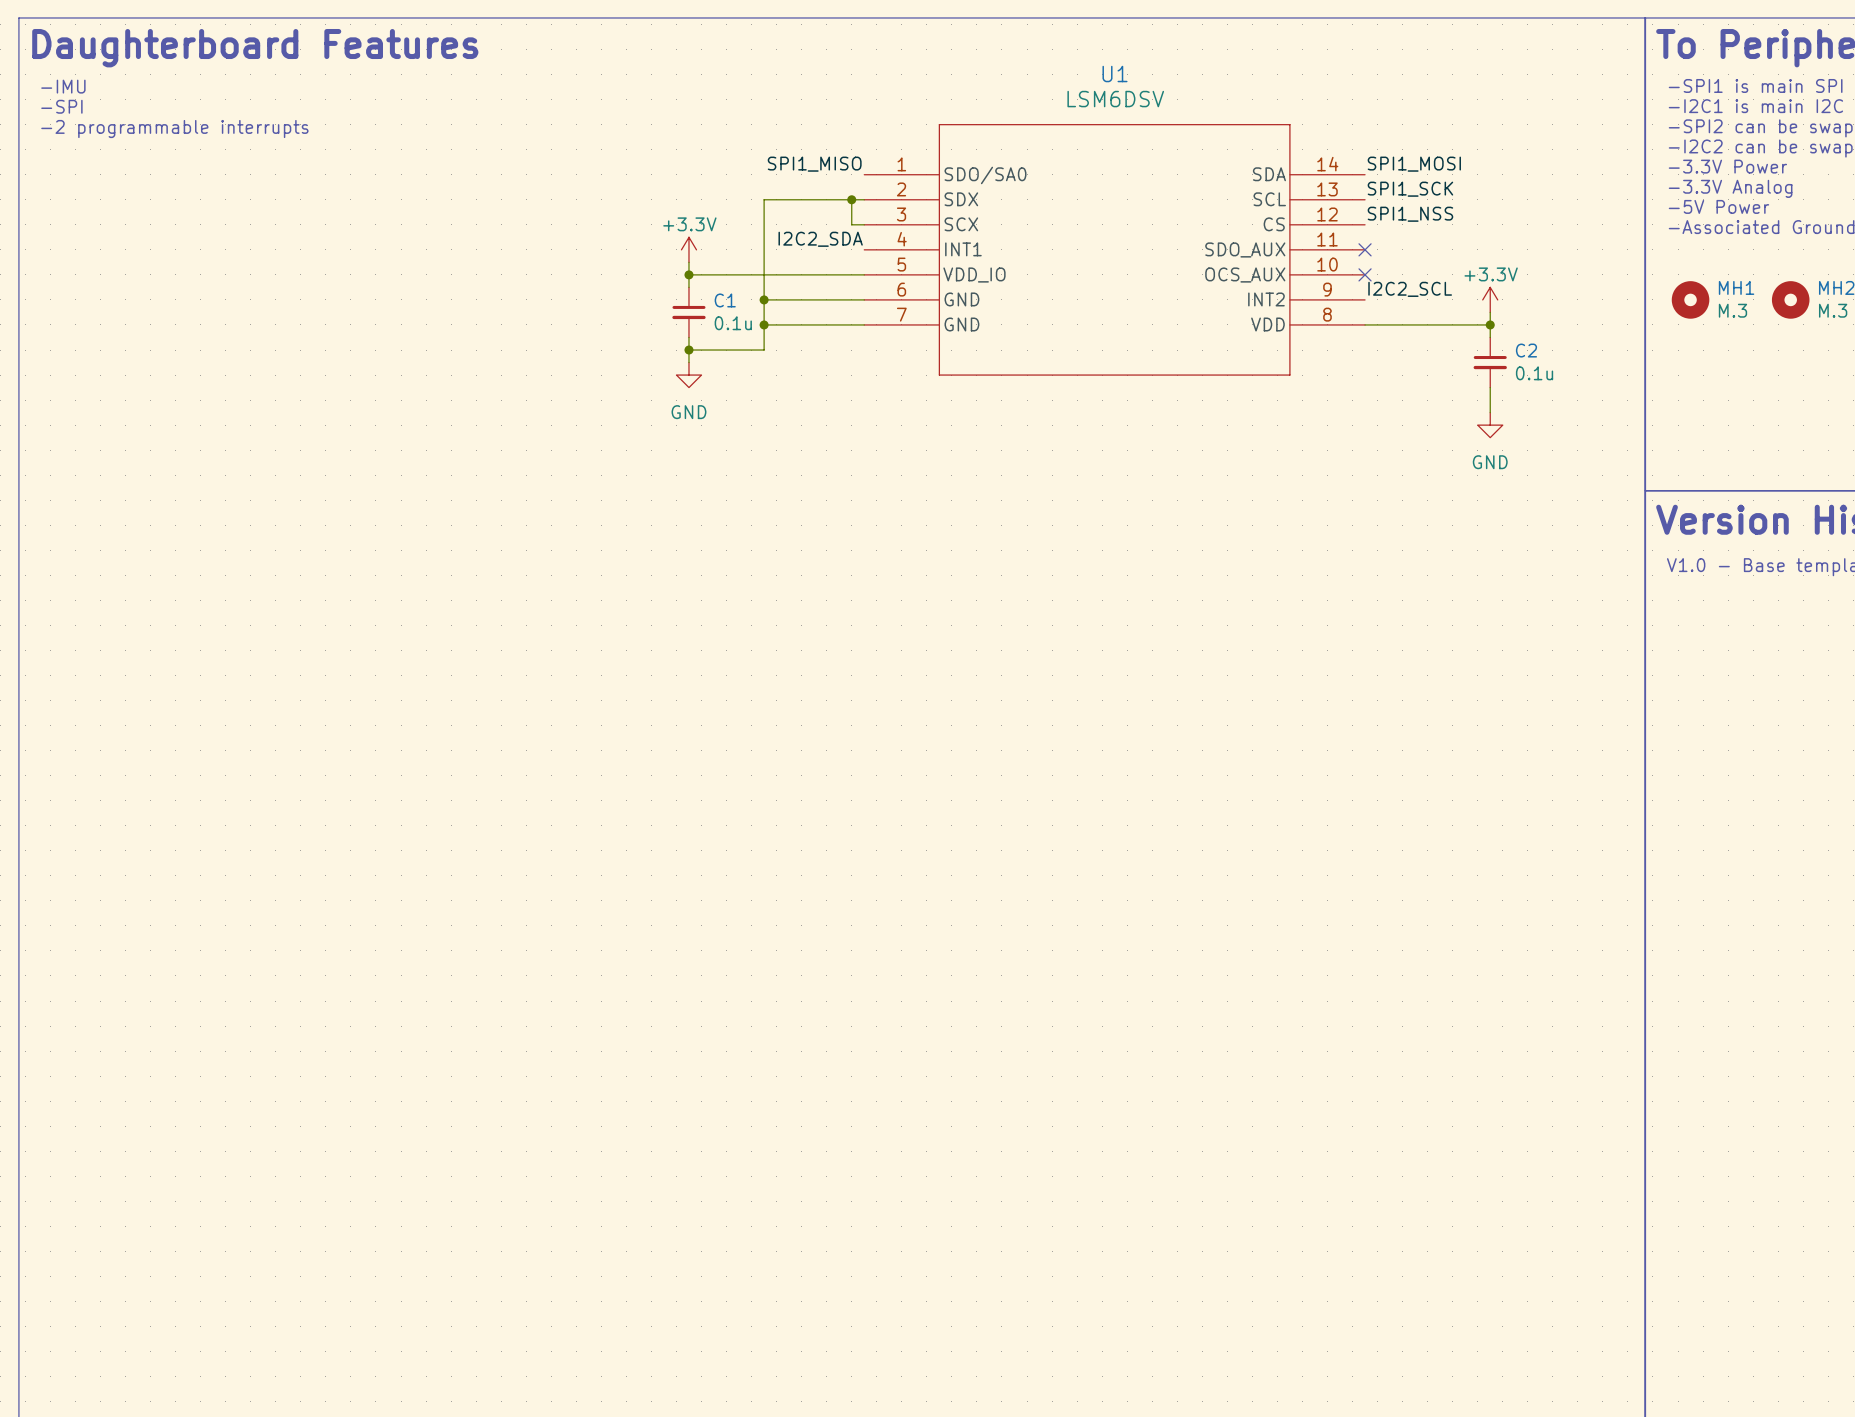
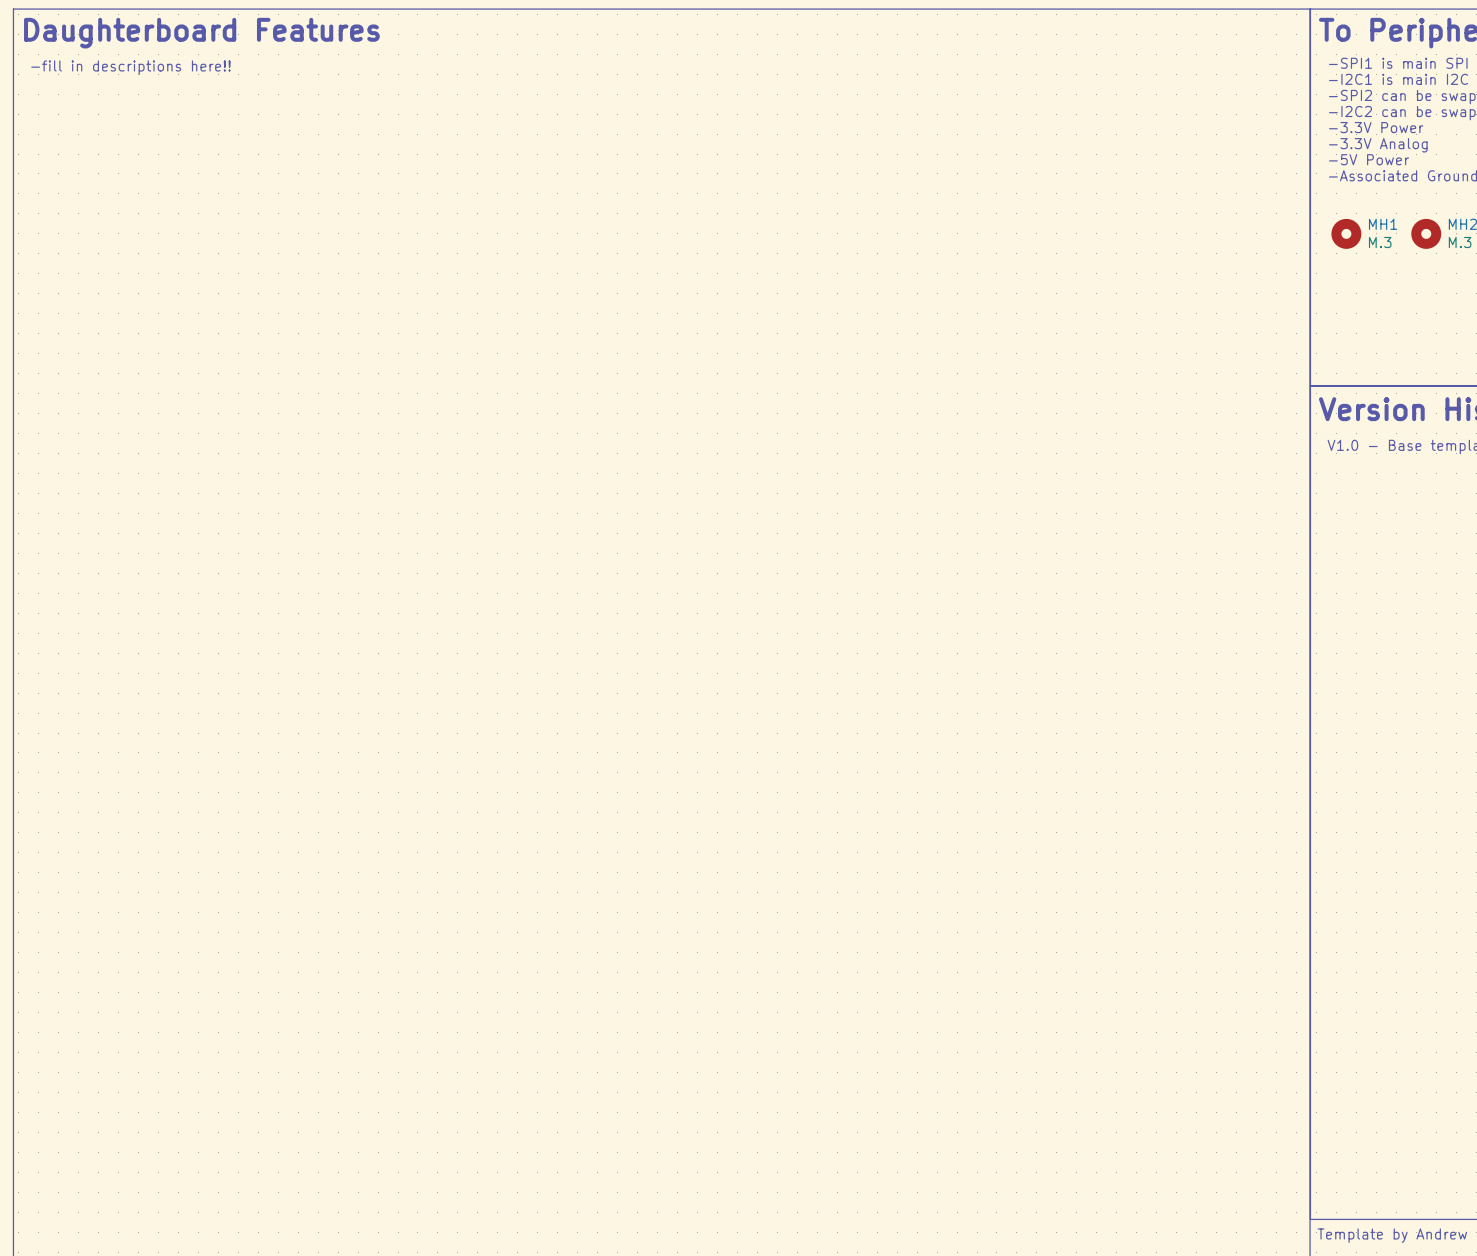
text: -IMU (63, 86) -> -fill in descriptions here!! (130, 67)
text: -SPI (61, 106) -> none
text: -2 programmable interrupts (174, 129) -> none
label: SPI1_MISO (814, 164) -> none
label: SPI1_MOSI (1414, 164) -> none
label: SPI1_SCK (1410, 189) -> none
wire: (851, 199) (851, 224) (864, 224) -> none
junction: (851, 199) -> none
wire: (864, 199) (764, 199) (764, 350) (688, 350) -> none
label: SPI1_NSS (1410, 214) -> none
label: I2C2_SDA (820, 239) -> none
power symbol: +3.3V (688, 249) -> none
U1: LSM6DSV (1114, 249) -> none
no-connect mark: (1365, 249) -> none
wire: (688, 262) (688, 287) -> none
wire: (688, 274) (864, 274) -> none
junction: (688, 274) -> none
no-connect mark: (1365, 274) -> none
label: I2C2_SCL (1410, 289) -> none
wire: (764, 299) (864, 299) -> none
junction: (764, 299) -> none
power symbol: +3.3V (1490, 299) -> none
C1: 0.1u (688, 312) -> none
wire: (1490, 312) (1490, 337) -> none
wire: (764, 324) (864, 324) -> none
junction: (764, 324) -> none
wire: (1365, 324) (1490, 324) -> none
junction: (1490, 324) -> none
wire: (688, 337) (688, 362) -> none
junction: (688, 350) -> none
C2: 0.1u (1490, 362) -> none
power symbol: GND (688, 375) -> none
wire: (1490, 387) (1490, 412) -> none
power symbol: GND (1490, 425) -> none

